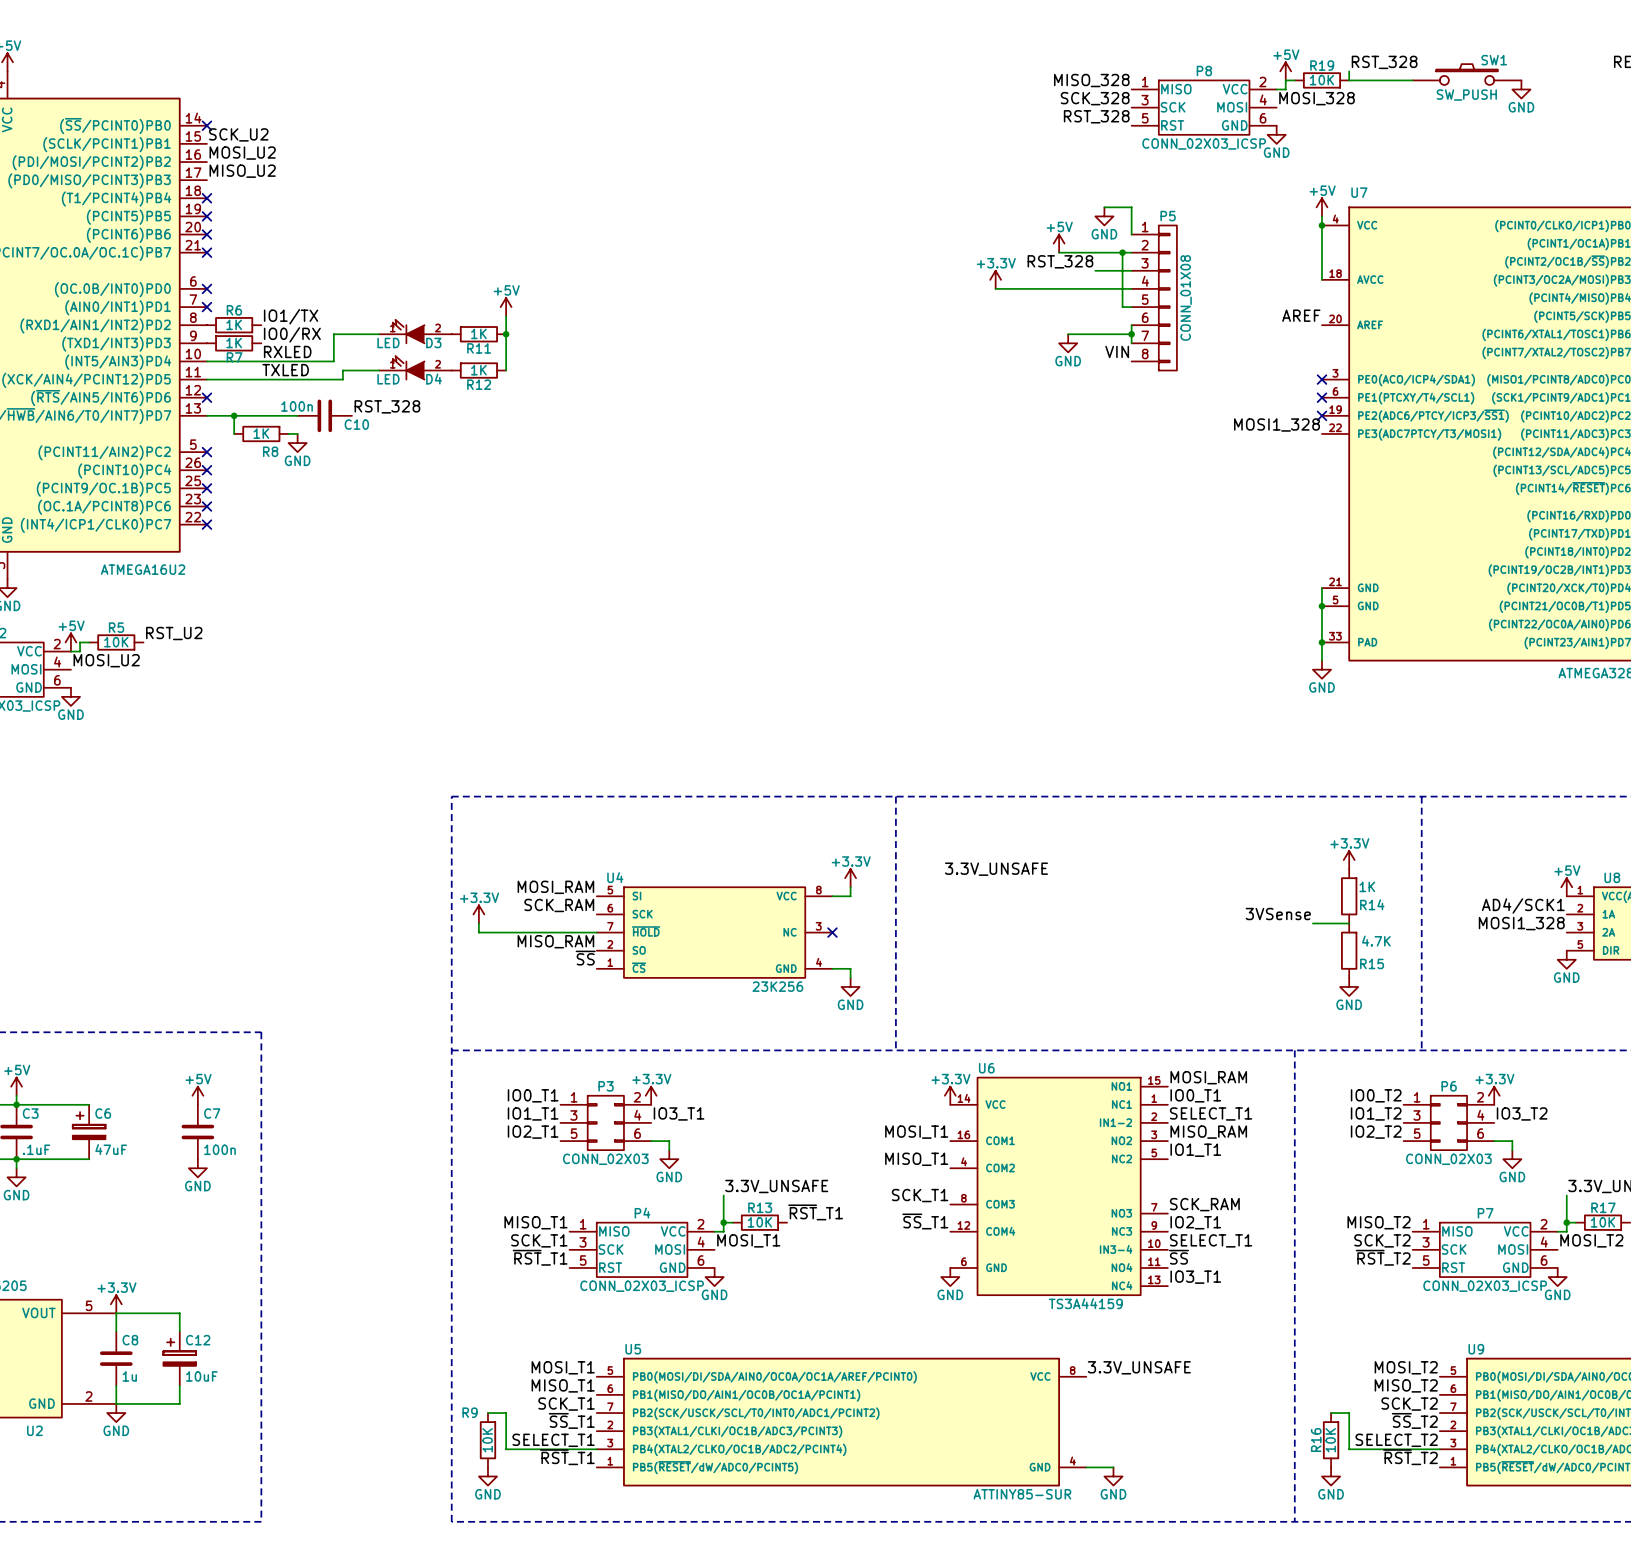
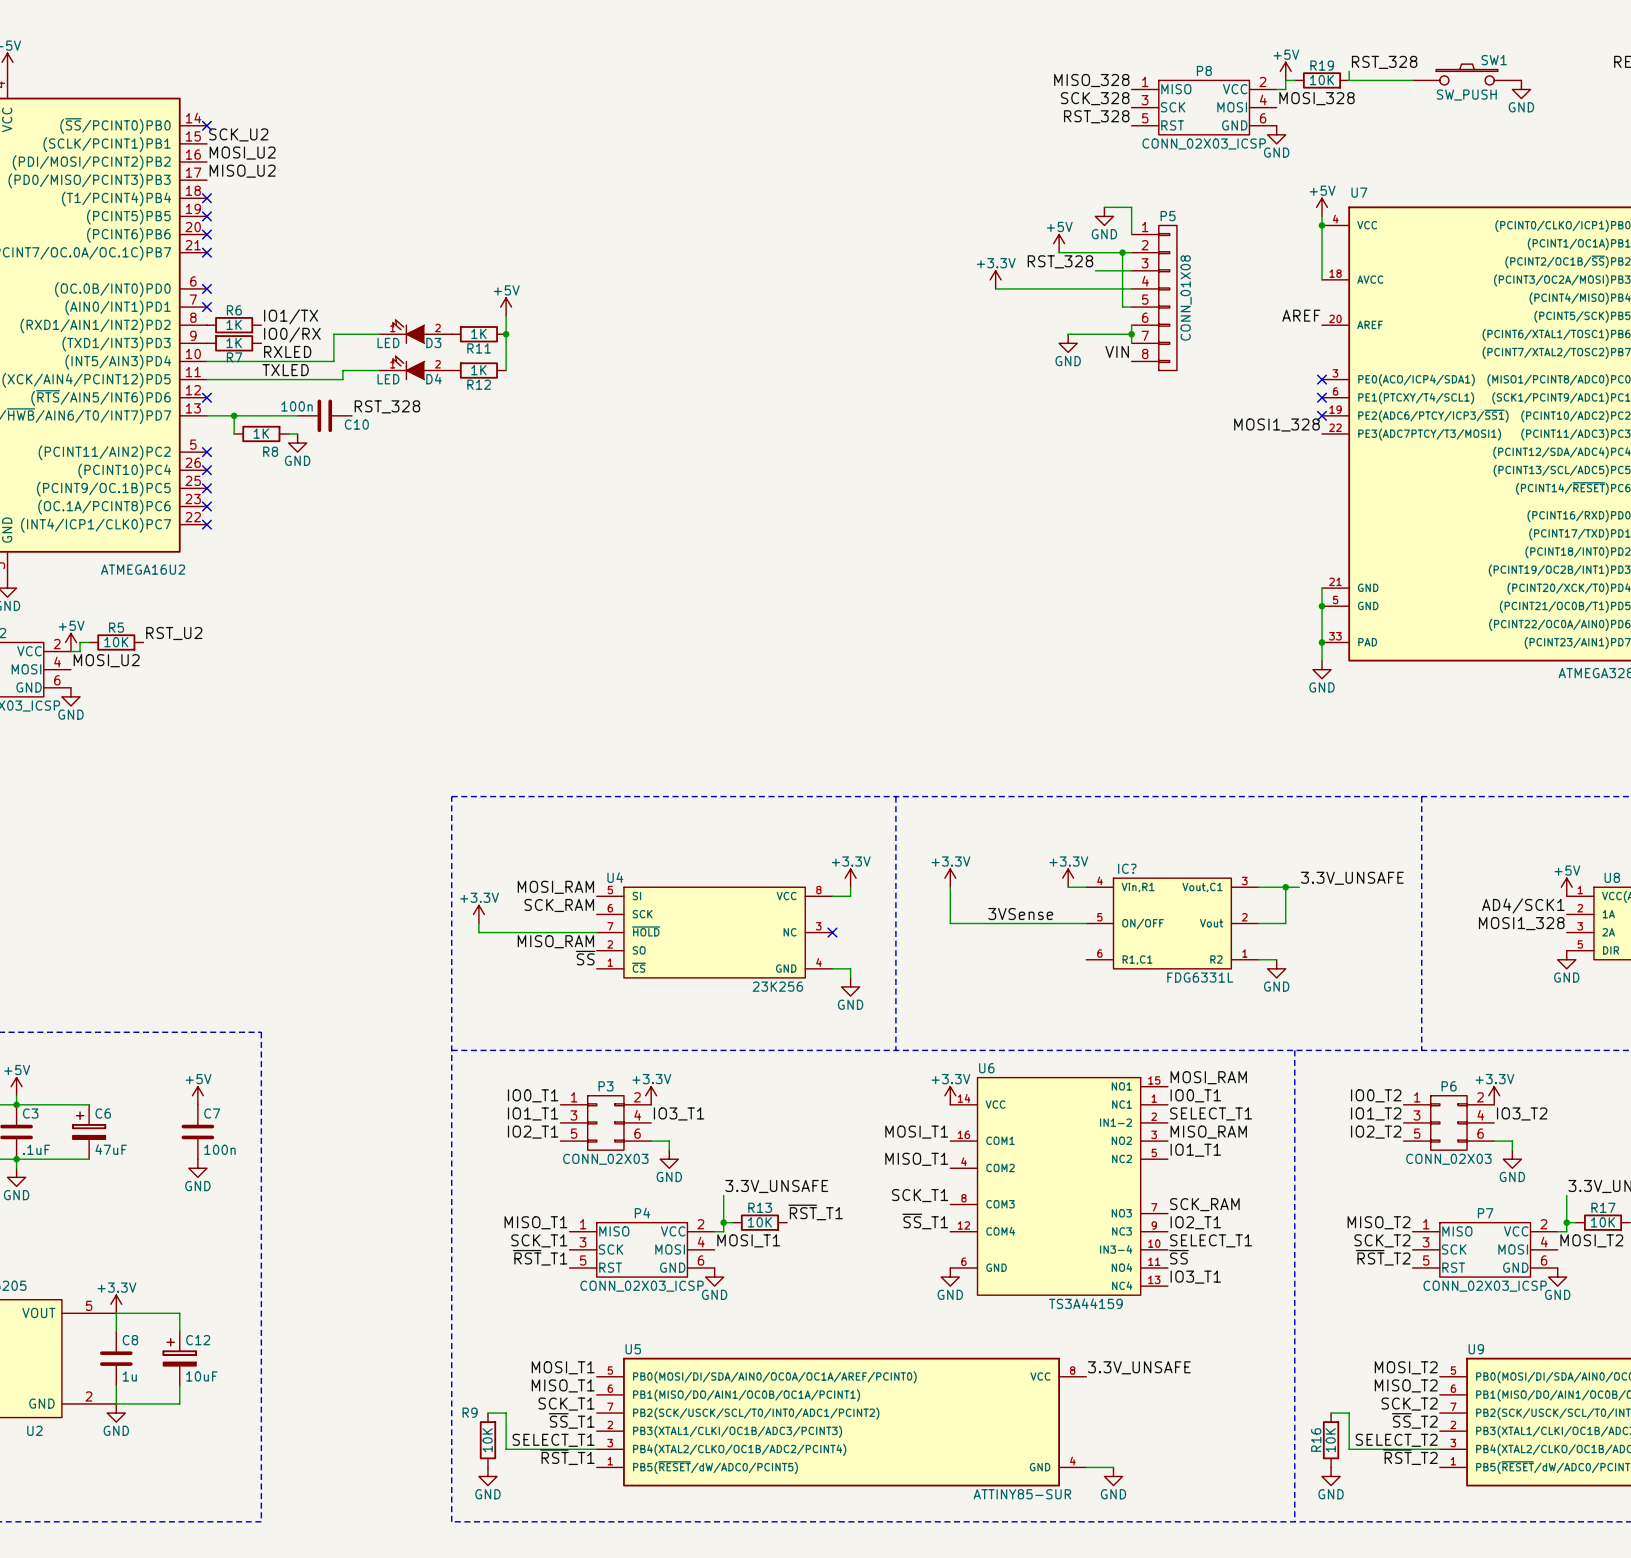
power symbol: +3.3V (1349, 860) -> none
label: 3.3V_UNSAFE (996, 869) -> none
power symbol: none -> +3.3V (950, 878)
power symbol: none -> +3.3V (1068, 878)
label: none -> 3.3V_UNSAFE (1352, 878)
wire: none -> (950, 887) (950, 923) (1086, 923)
wire: none -> (1068, 887) (1086, 887)
wire: none -> (1258, 887) (1299, 887)
wire: none -> (1285, 887) (1285, 923) (1258, 923)
junction: none -> (1285, 887)
R14: 1K (1349, 896) -> none
label: none -> 3VSense (1020, 914)
label: 3VSense (1278, 914) -> none
IC?: none -> FDG6331L (1172, 923)
wire: (1312, 923) (1349, 923) -> none
R15: 4.7K (1349, 950) -> none
wire: none -> (1258, 959) (1276, 959)
power symbol position: GND (1349, 986) -> GND (1276, 968)

